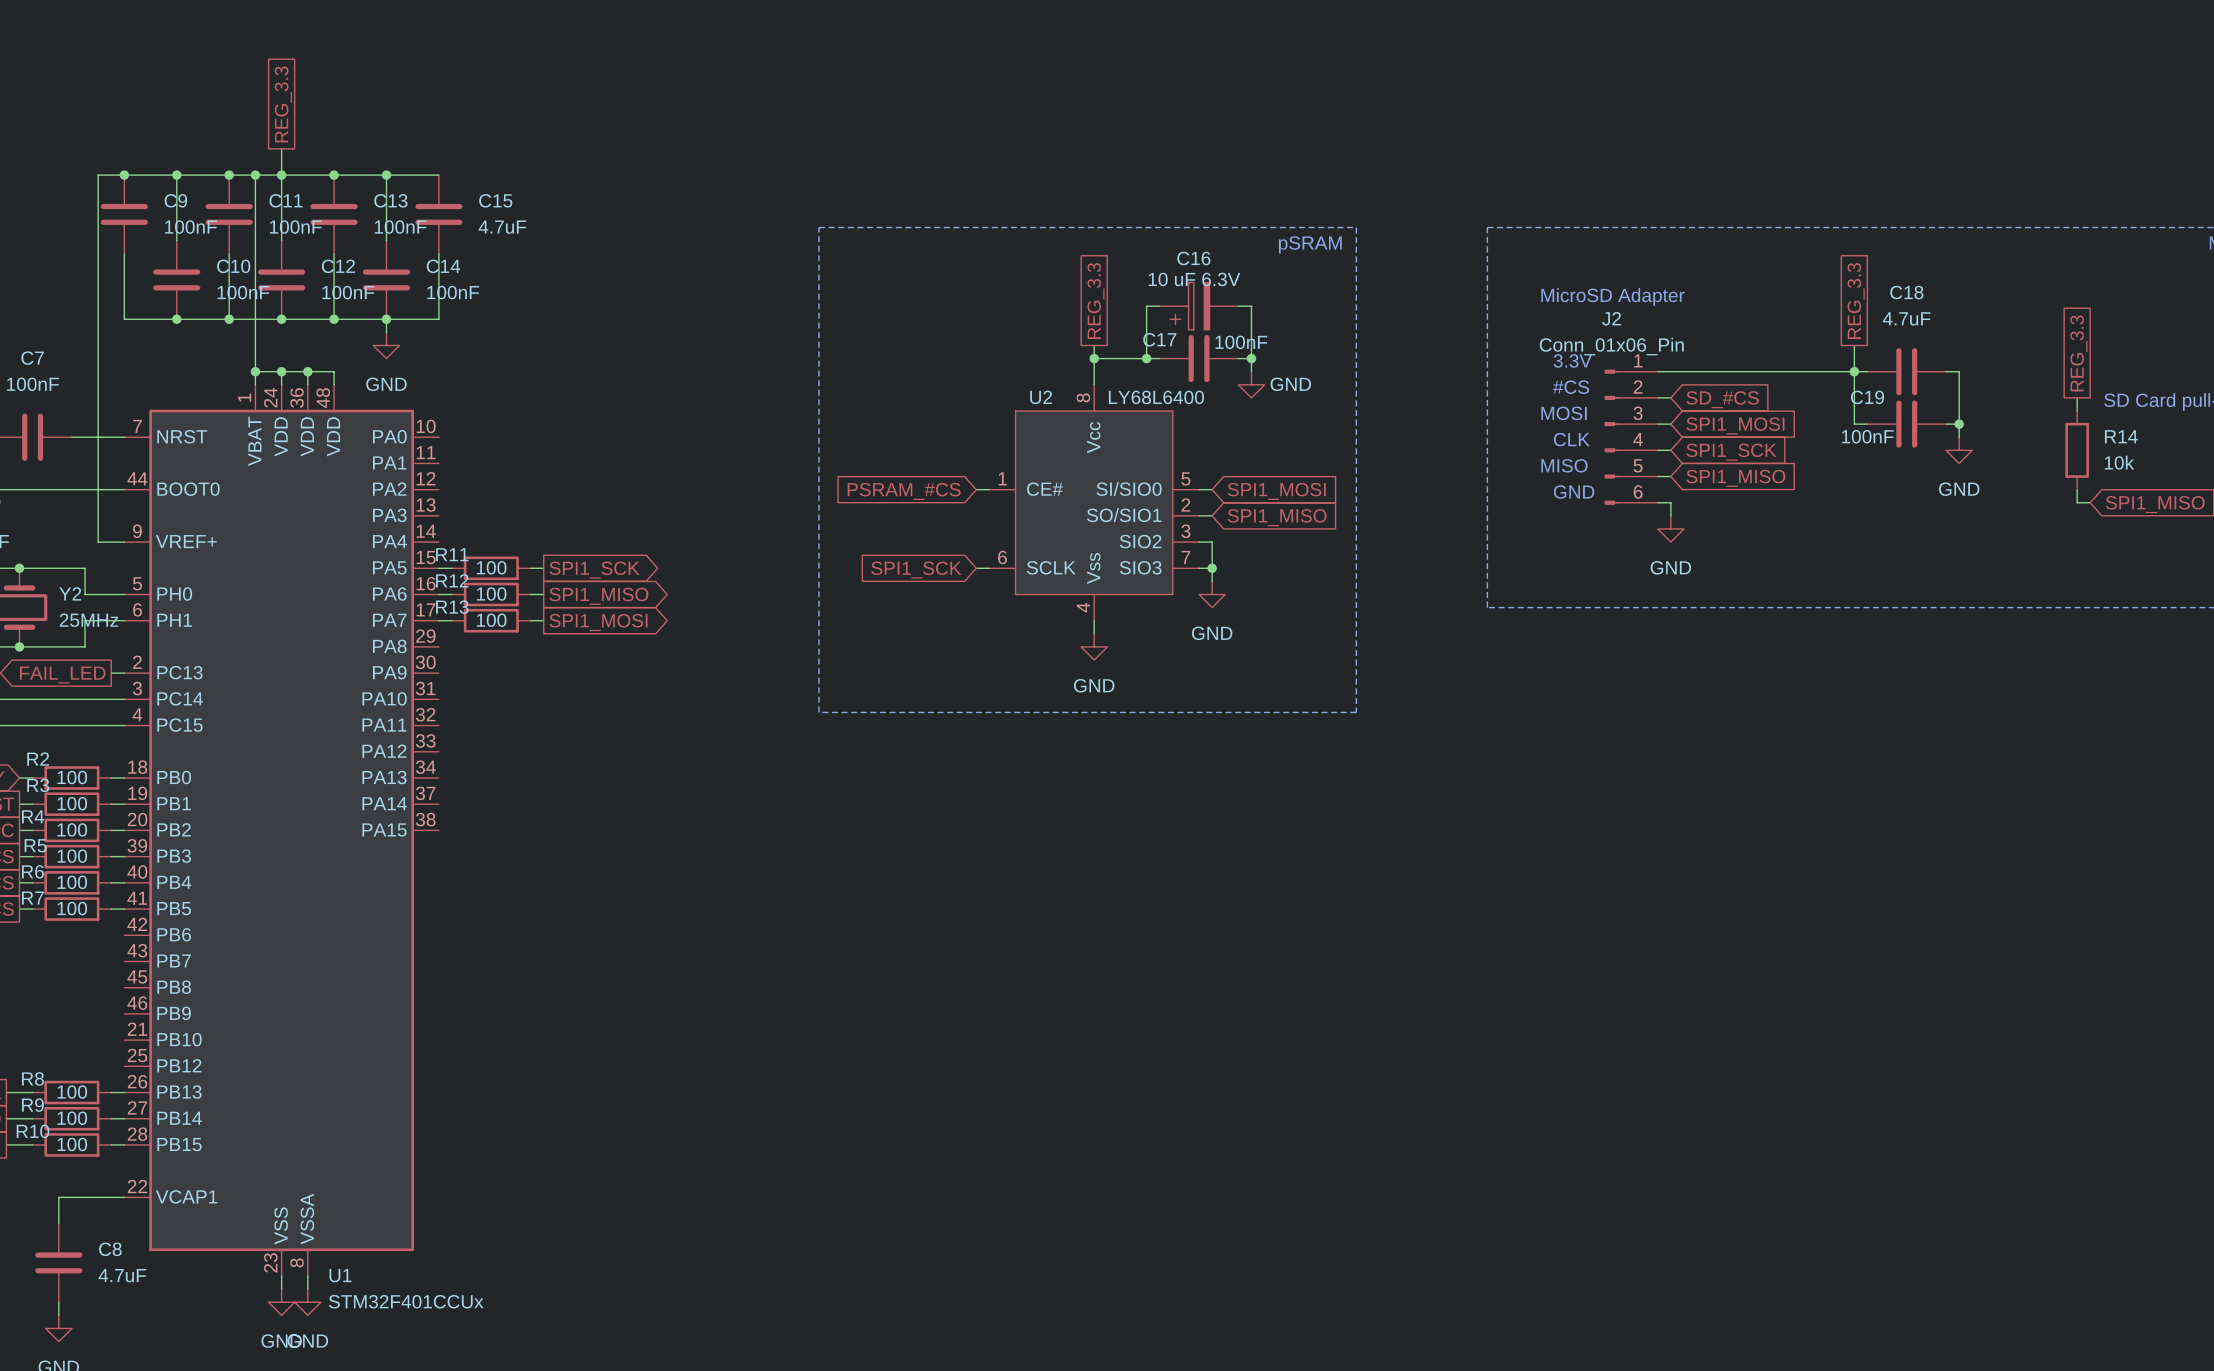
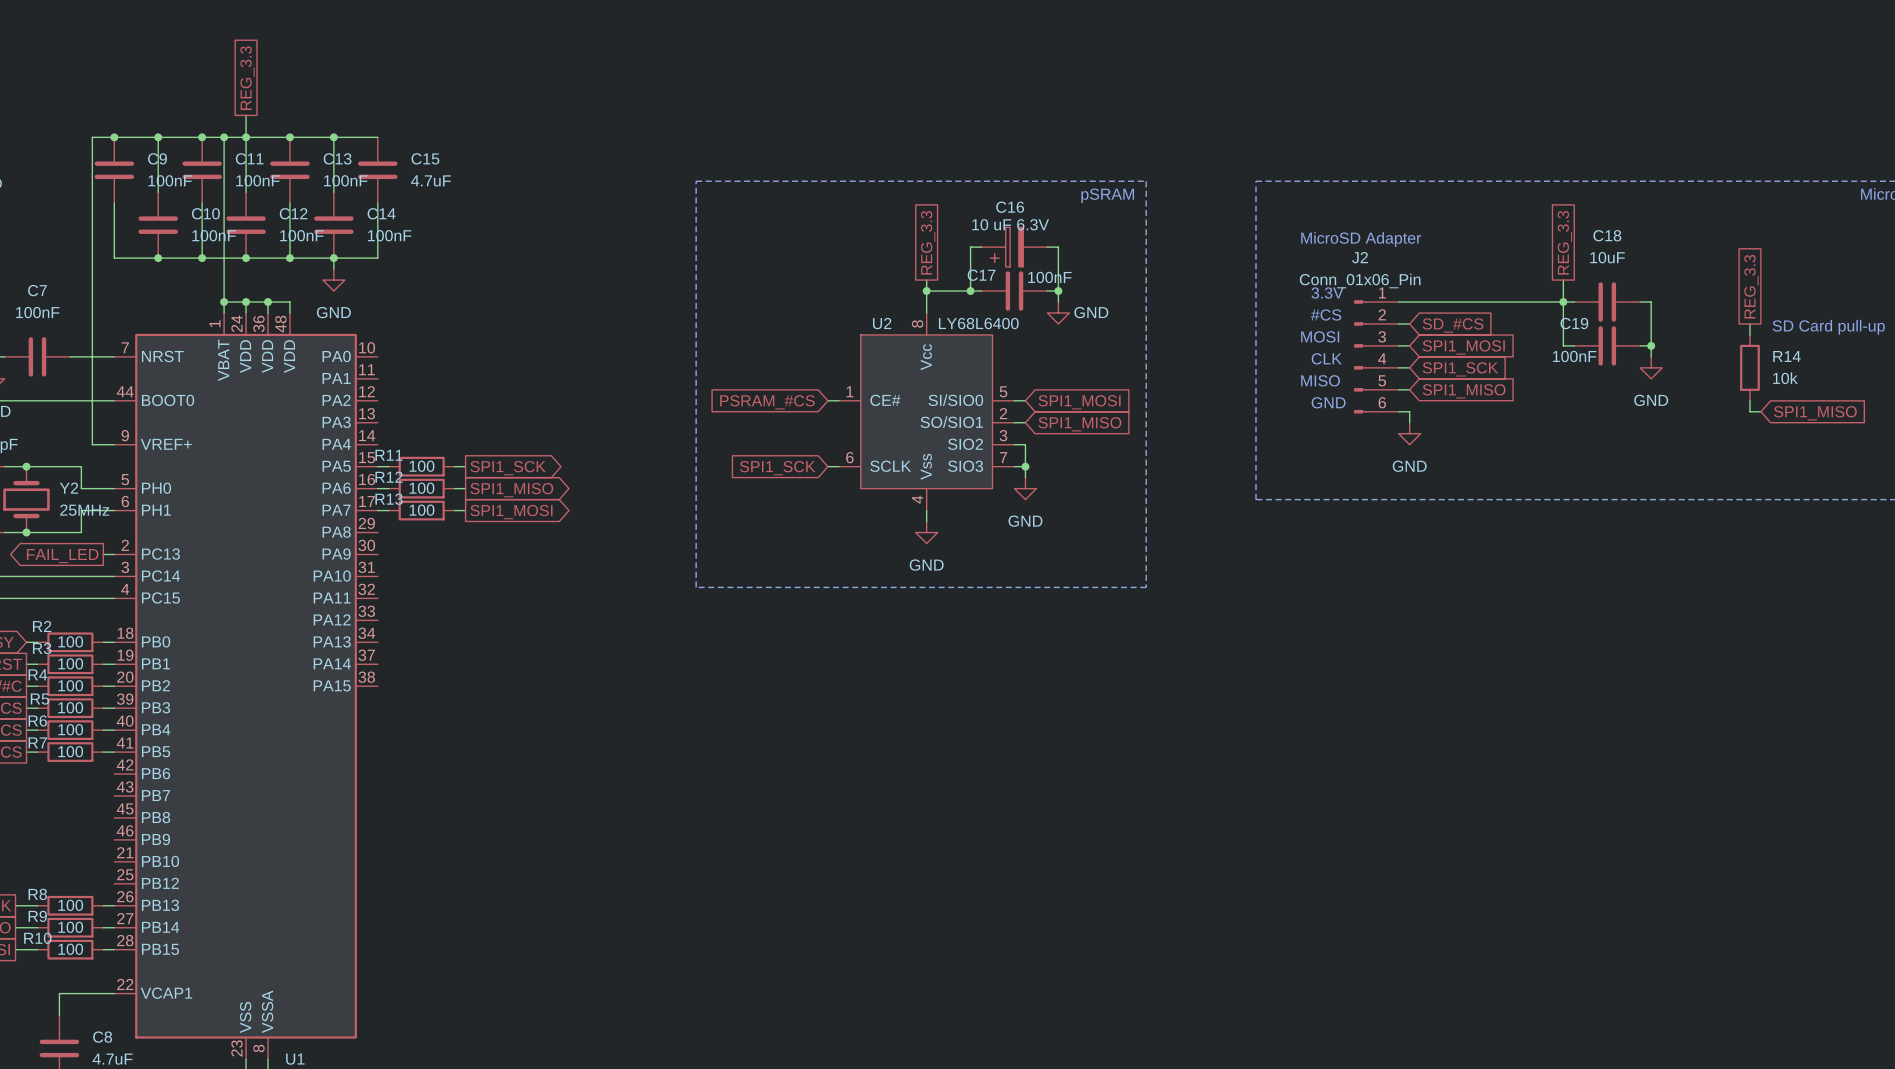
C18 value: 4.7uF (1906, 318) -> 10uF (1607, 257)

